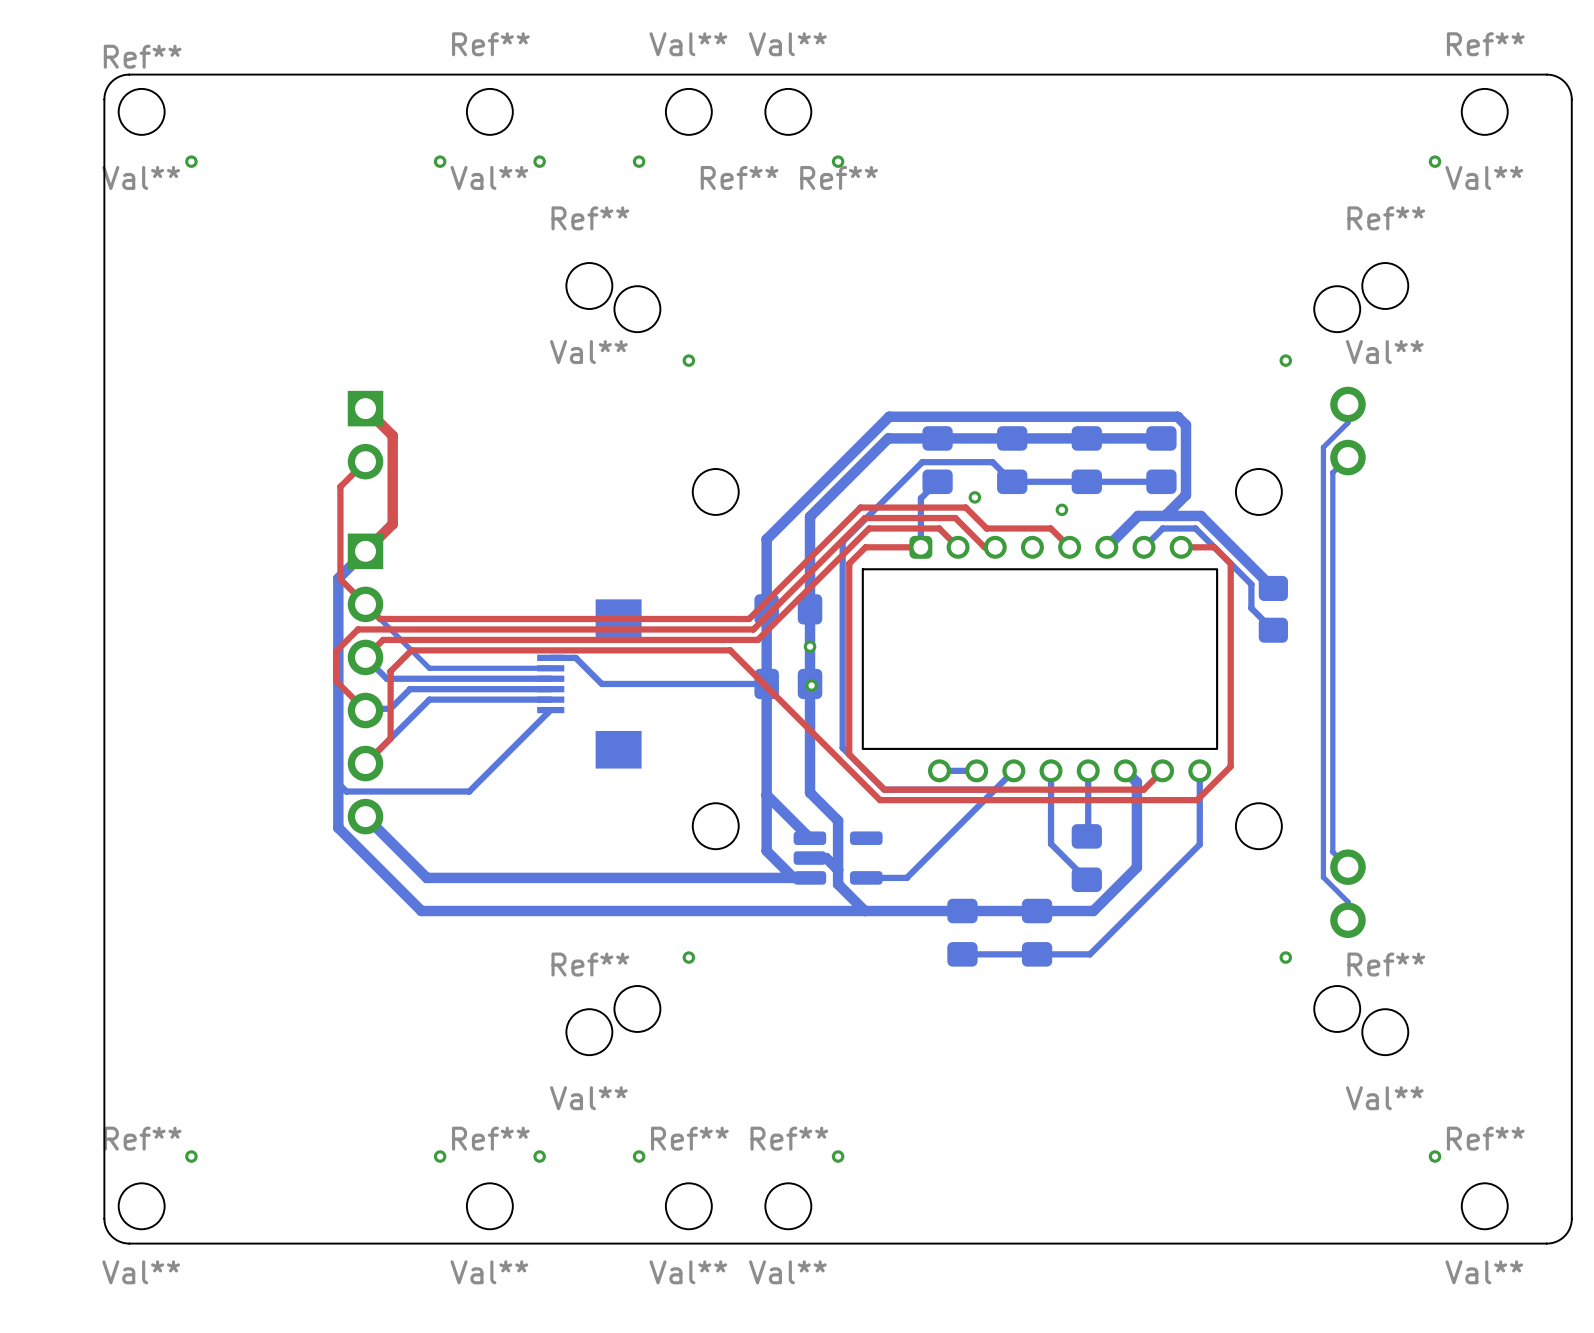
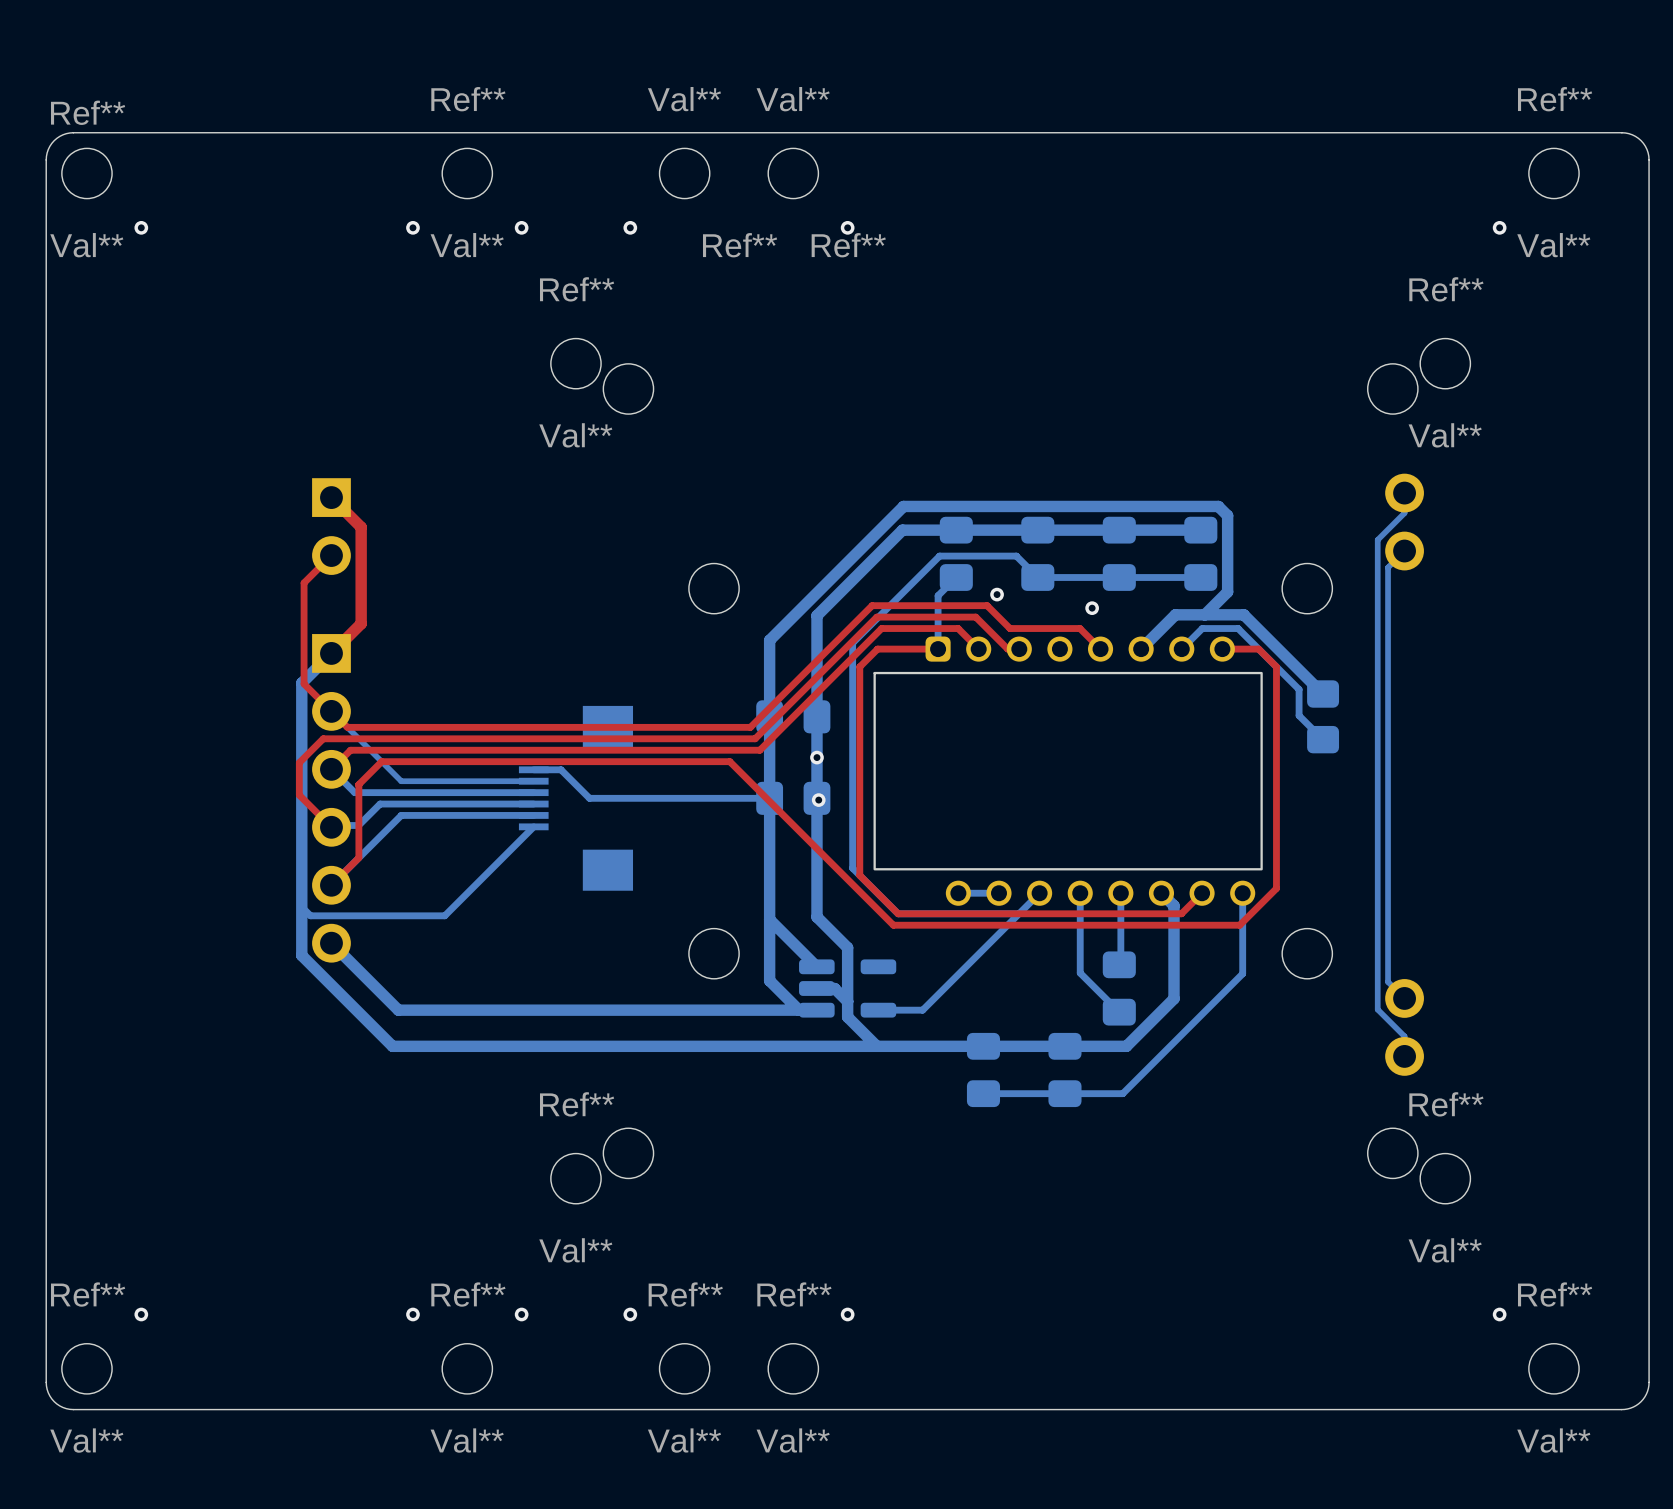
via: (688, 360) -> none
via: (1285, 360) -> none
via: (688, 957) -> none
via: (1285, 957) -> none

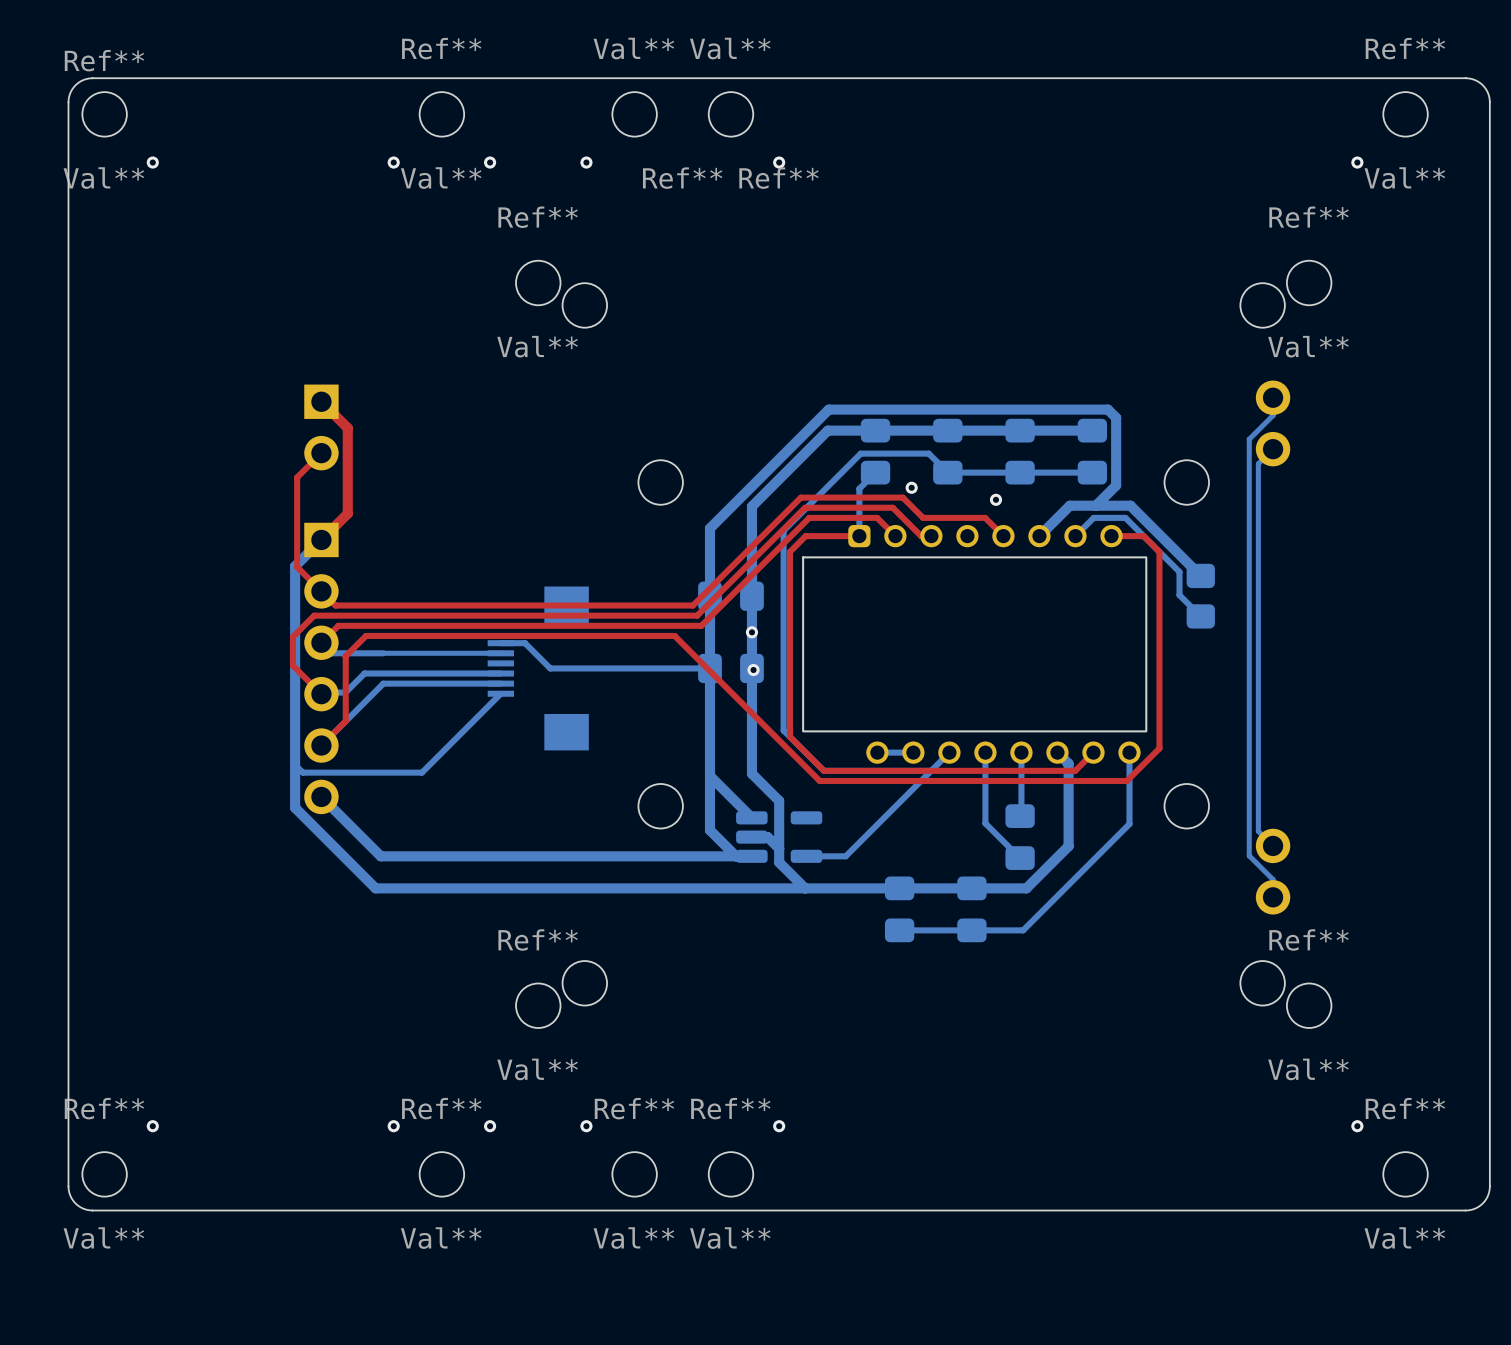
bottom track: (331, 711) (401, 781) -> (331, 653) (383, 653)
bottom track: (343, 781) (354, 792) (533, 792) -> none

